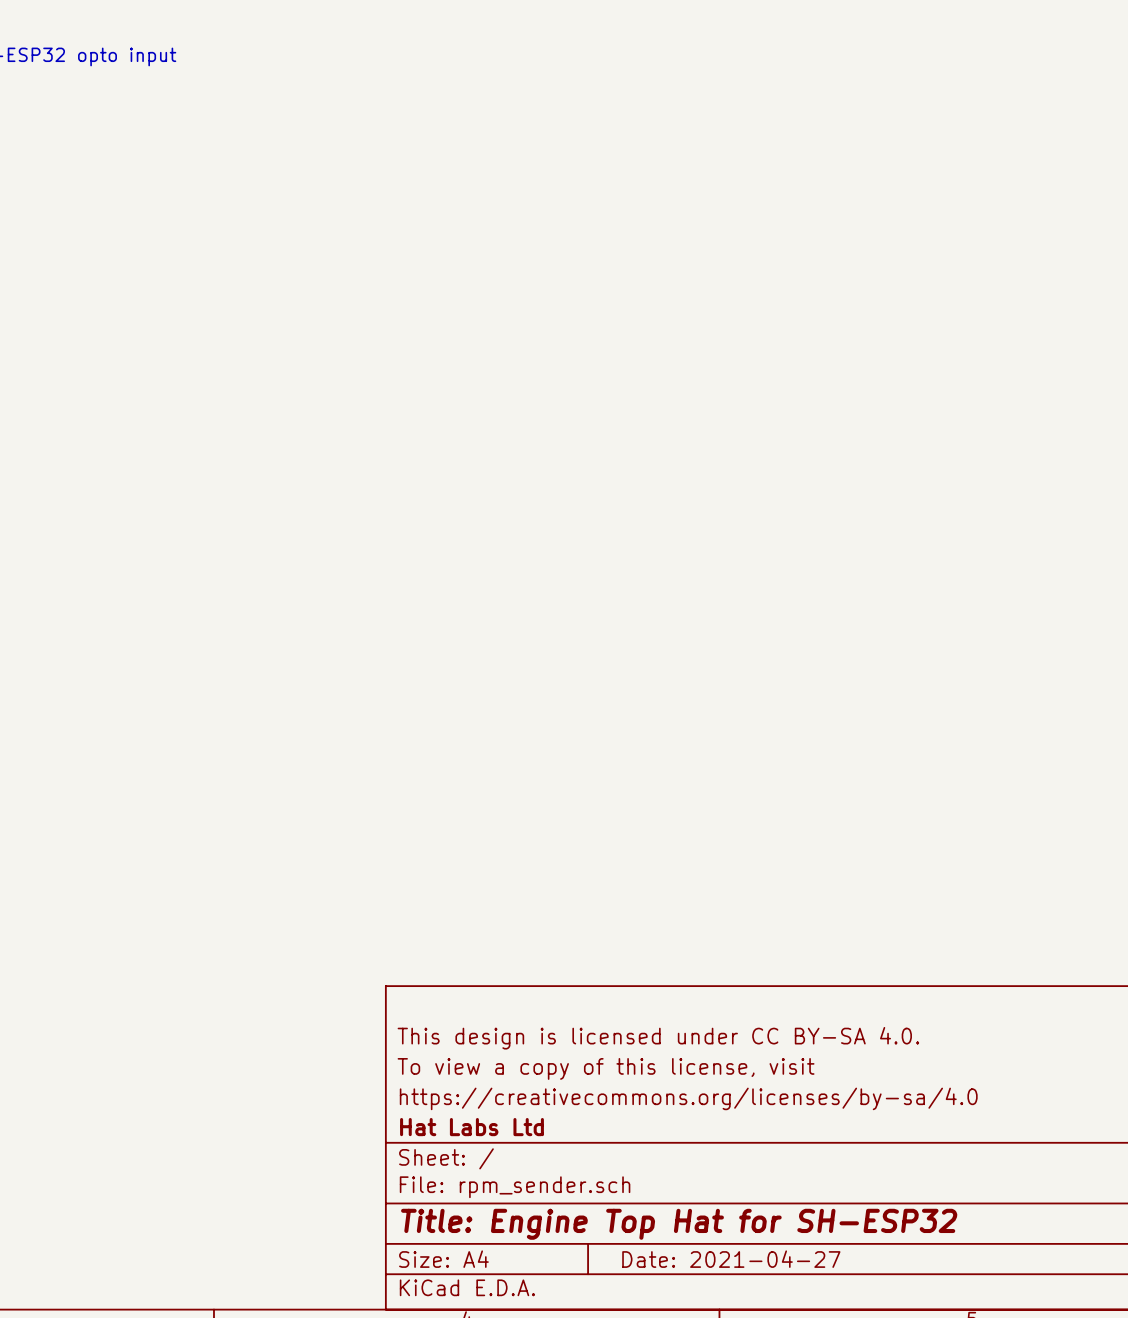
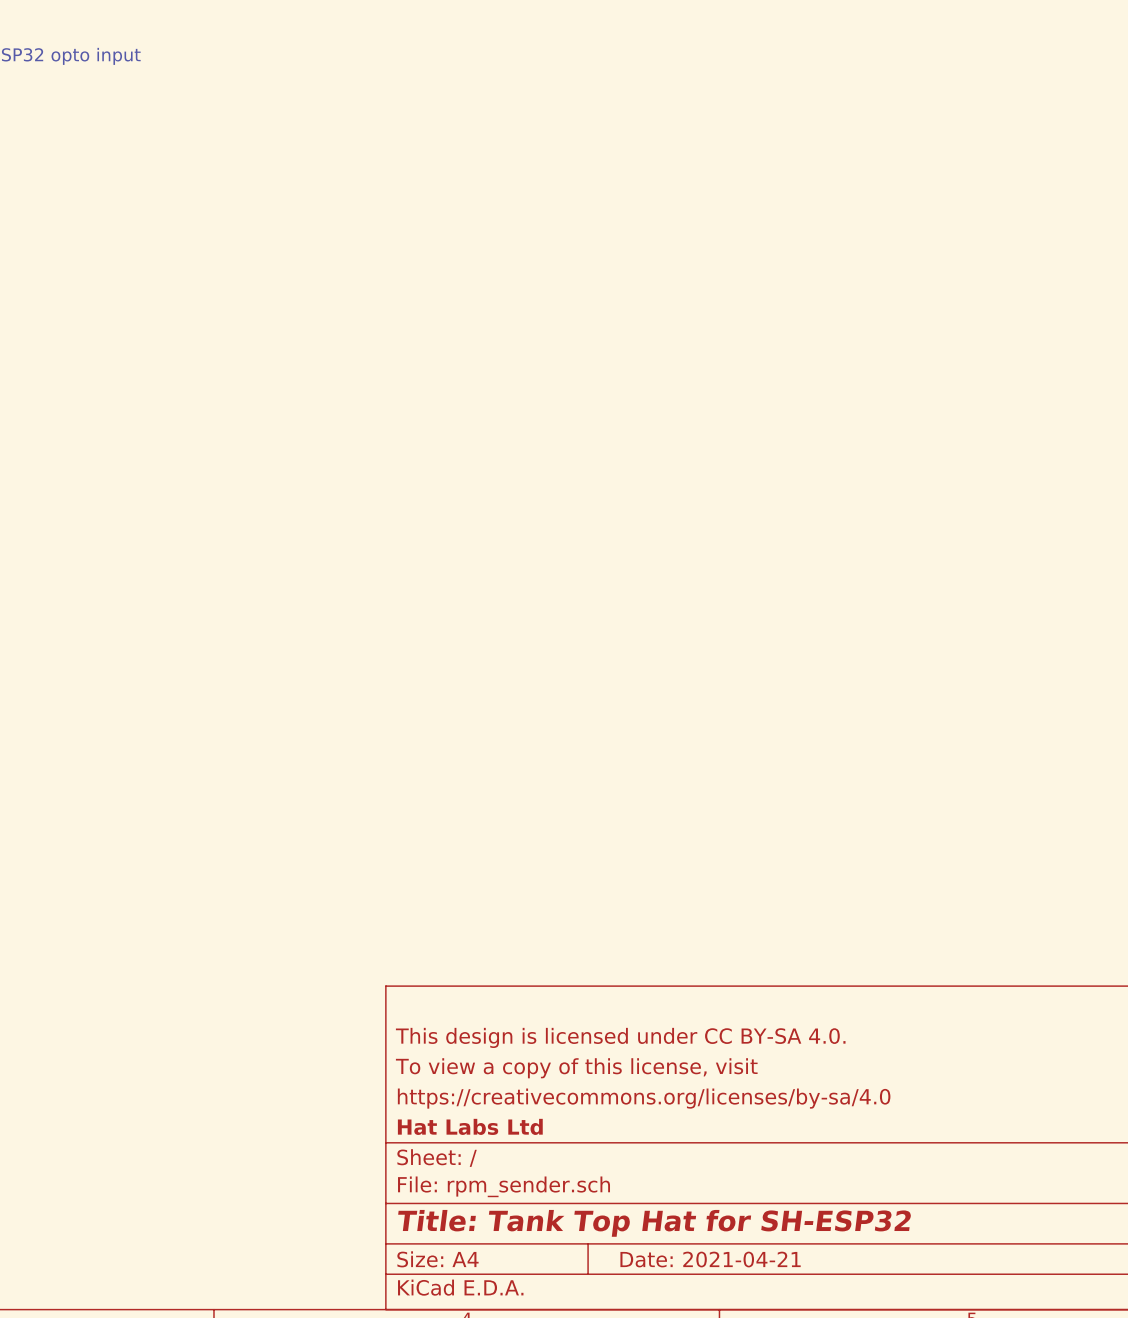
title block: Title: Engine Top Hat for SH-ESP32 (679, 1224) -> Title: Tank Top Hat for SH-ESP32 (654, 1223)
title block: Date: 2021-04-27 (731, 1259) -> Date: 2021-04-21 (710, 1259)

